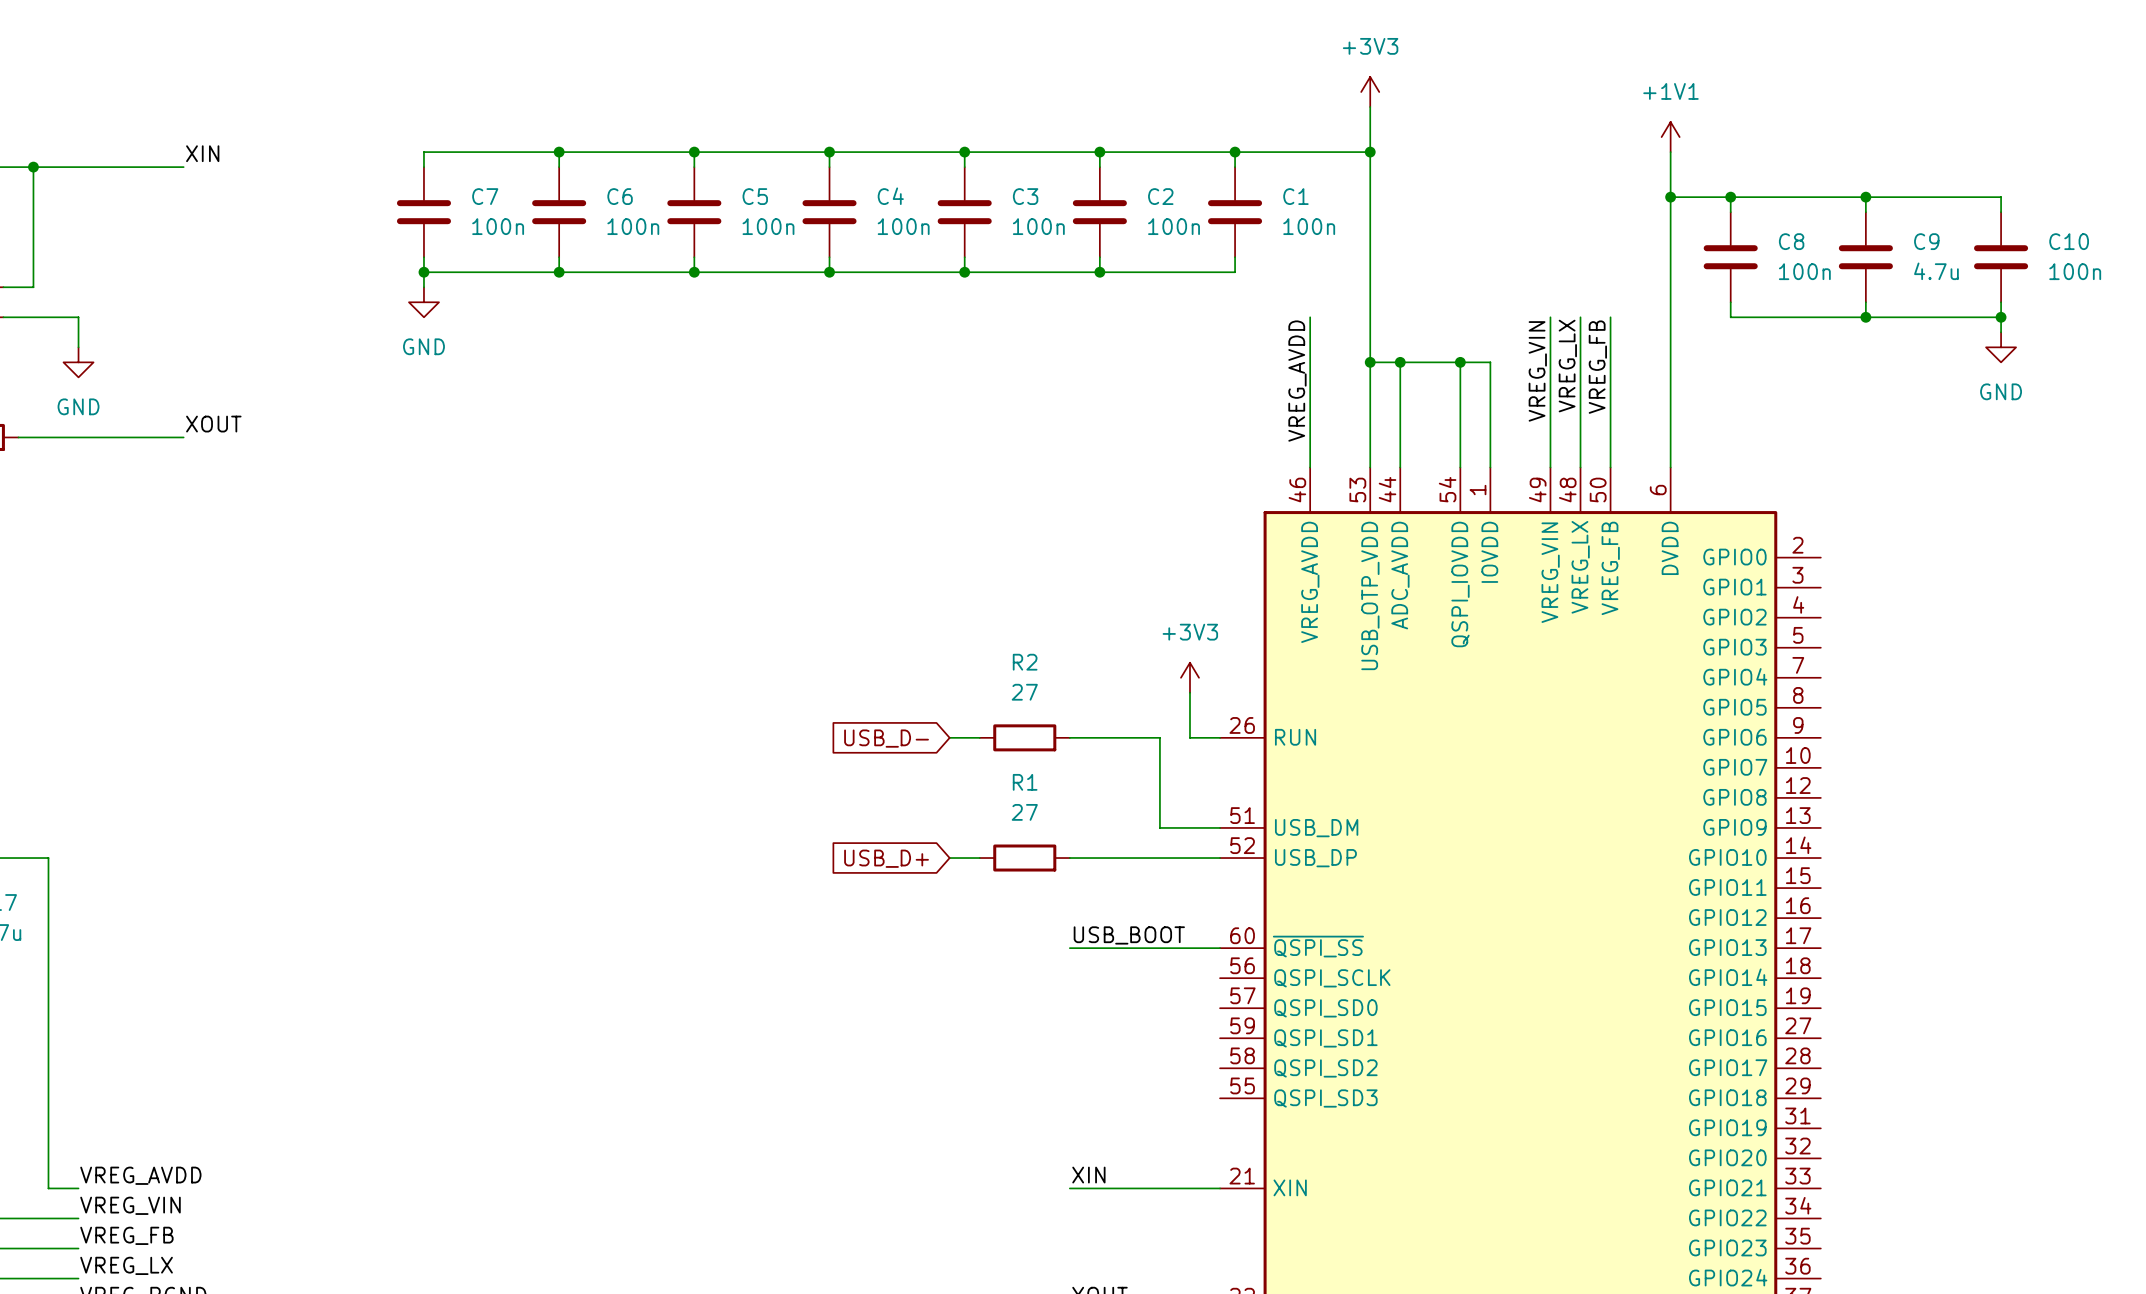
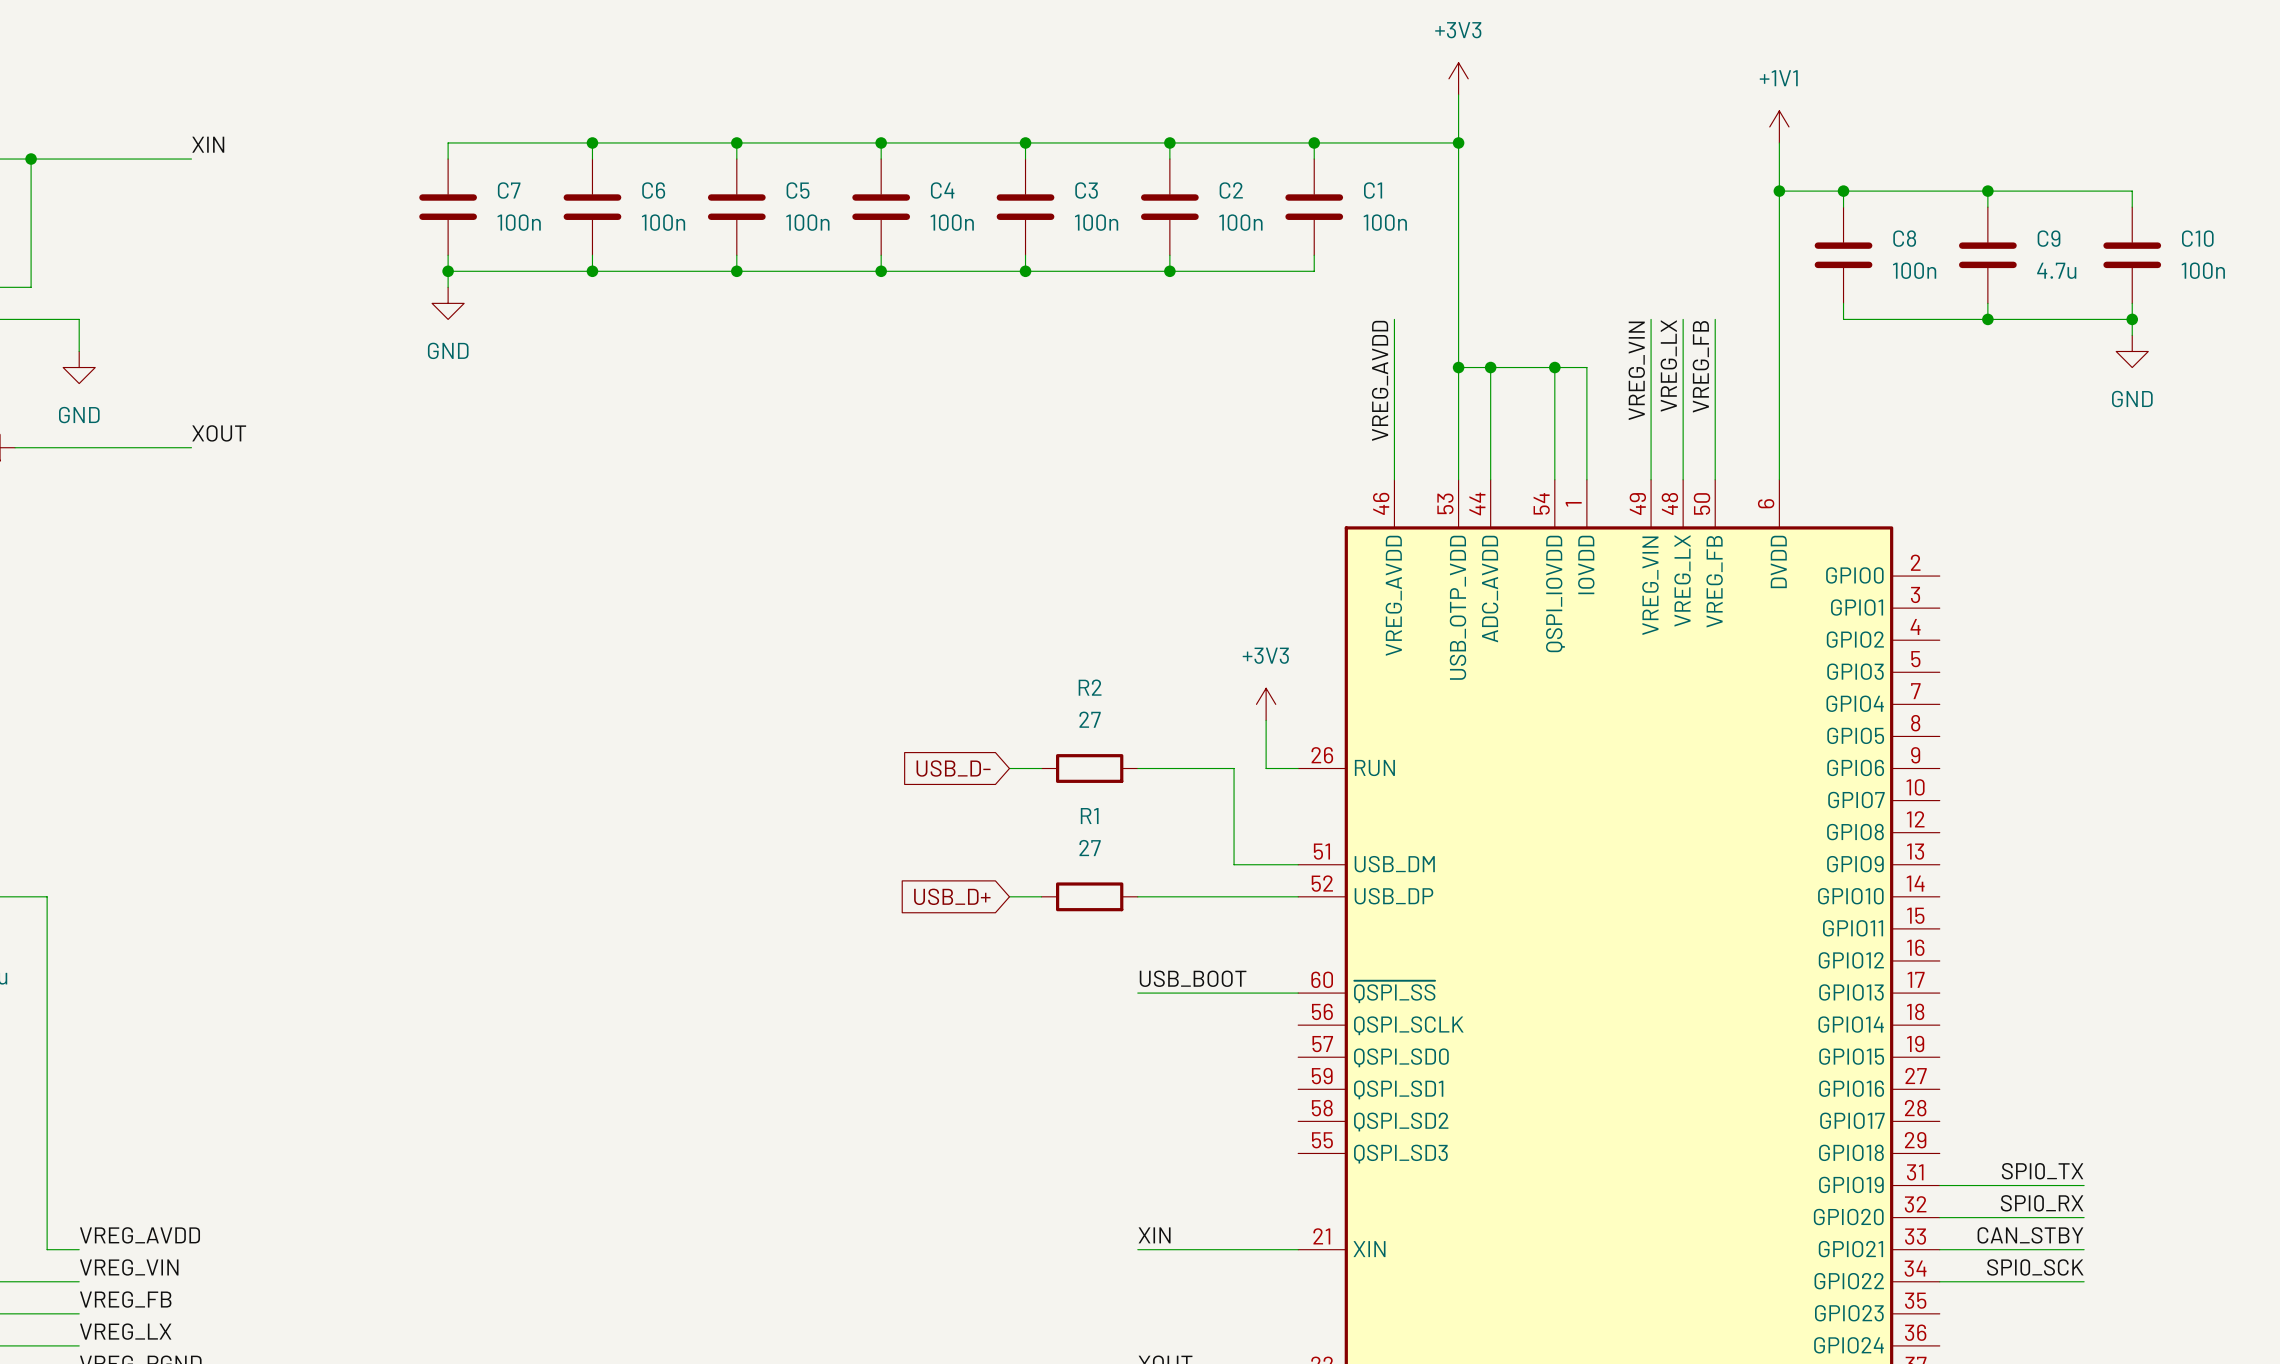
label: none -> SPI0_TX (2042, 1171)
wire: none -> (1939, 1185) (2084, 1185)
label: none -> SPI0_RX (2042, 1203)
wire: none -> (1939, 1217) (2084, 1217)
label: none -> CAN_STBY (2030, 1235)
wire: none -> (1939, 1249) (2084, 1249)
label: none -> SPI0_SCK (2035, 1267)
wire: none -> (1939, 1281) (2084, 1281)

